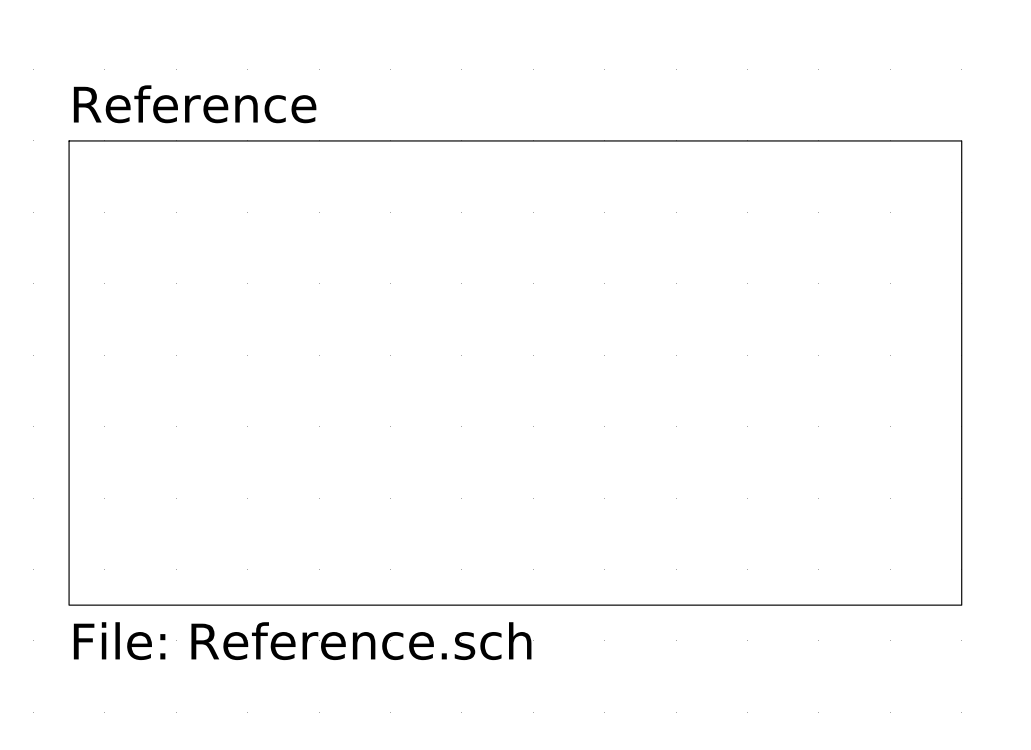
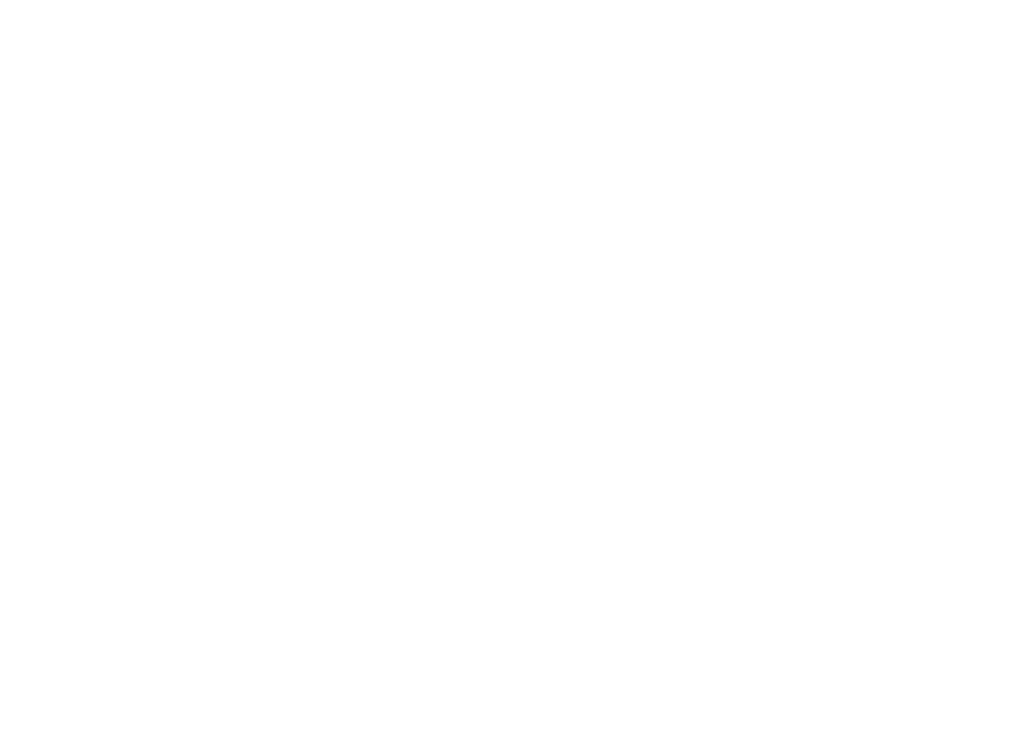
sheet Reference: File: Reference.sch (515, 373) -> none

